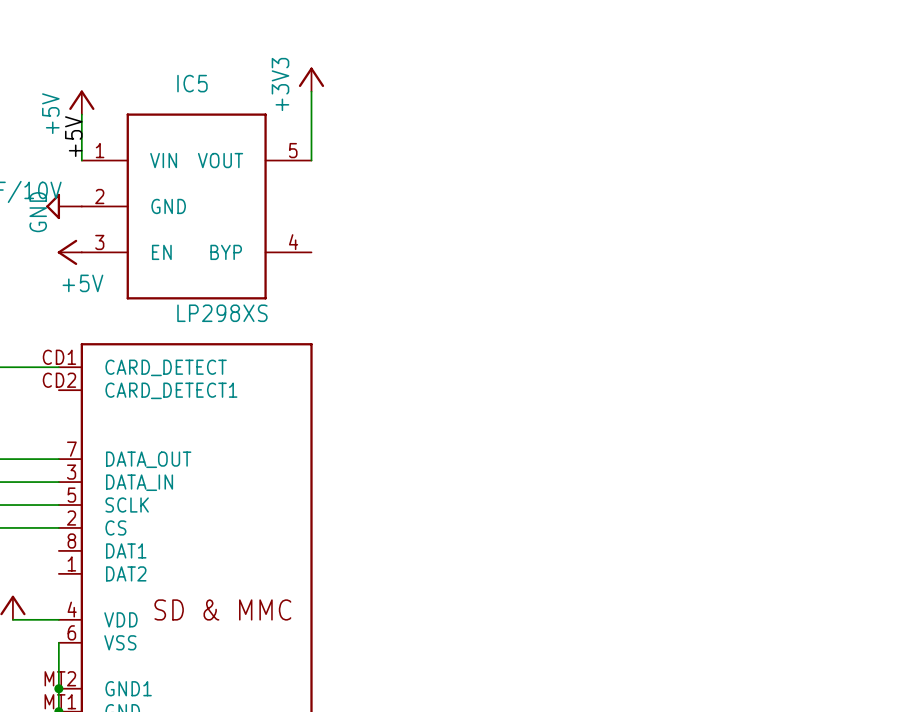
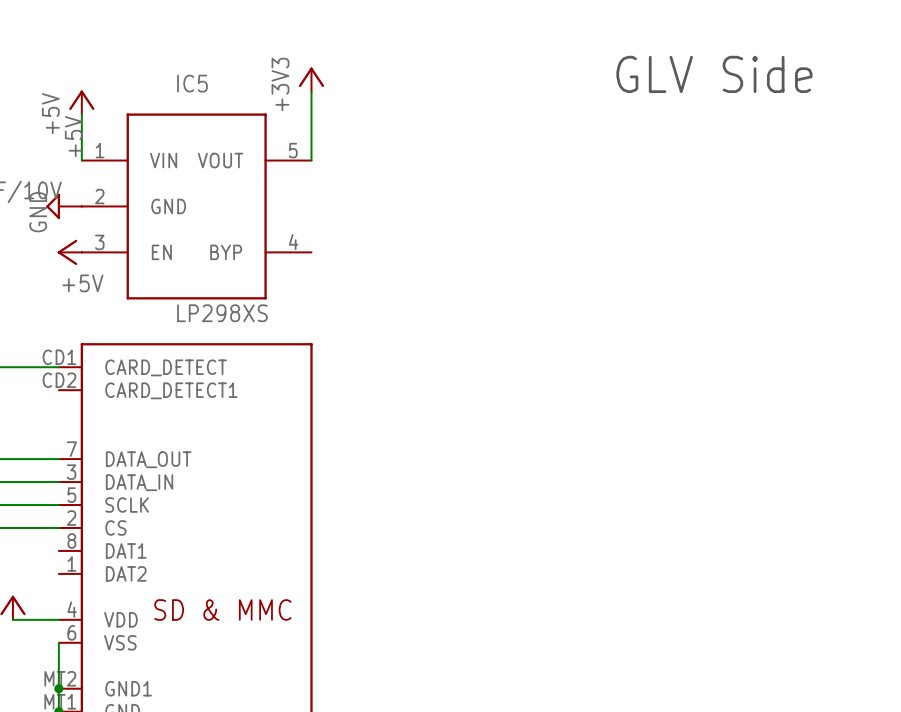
text: none -> GLV Side (714, 74)

